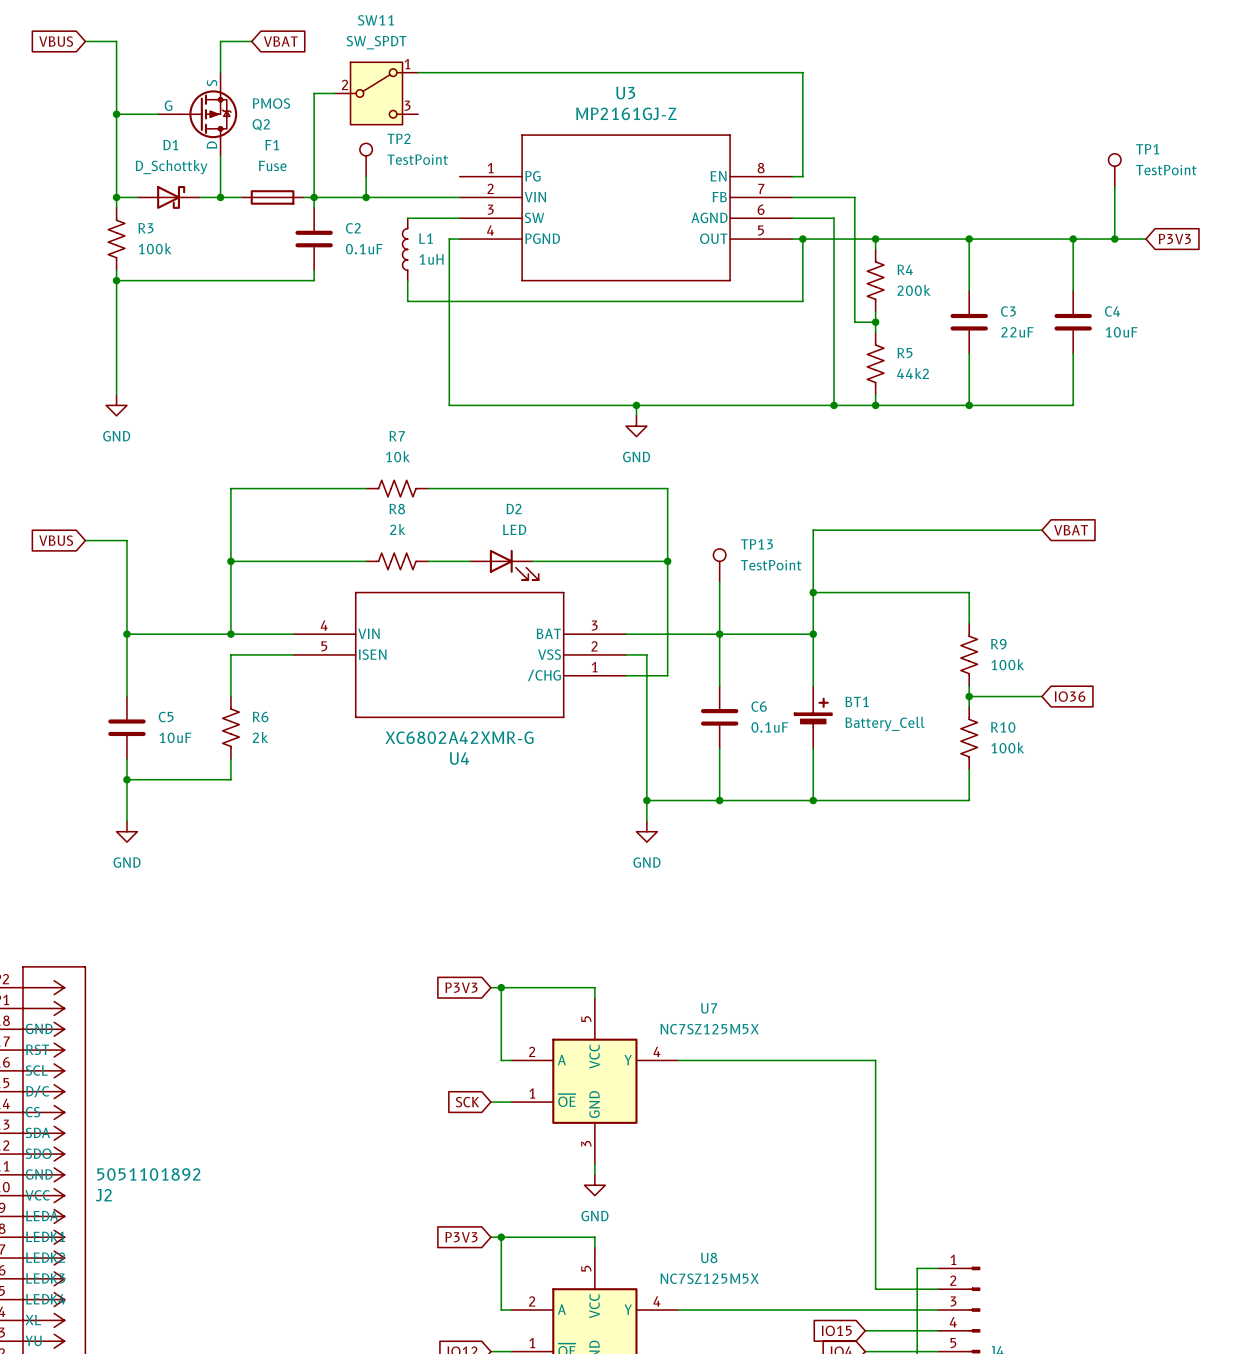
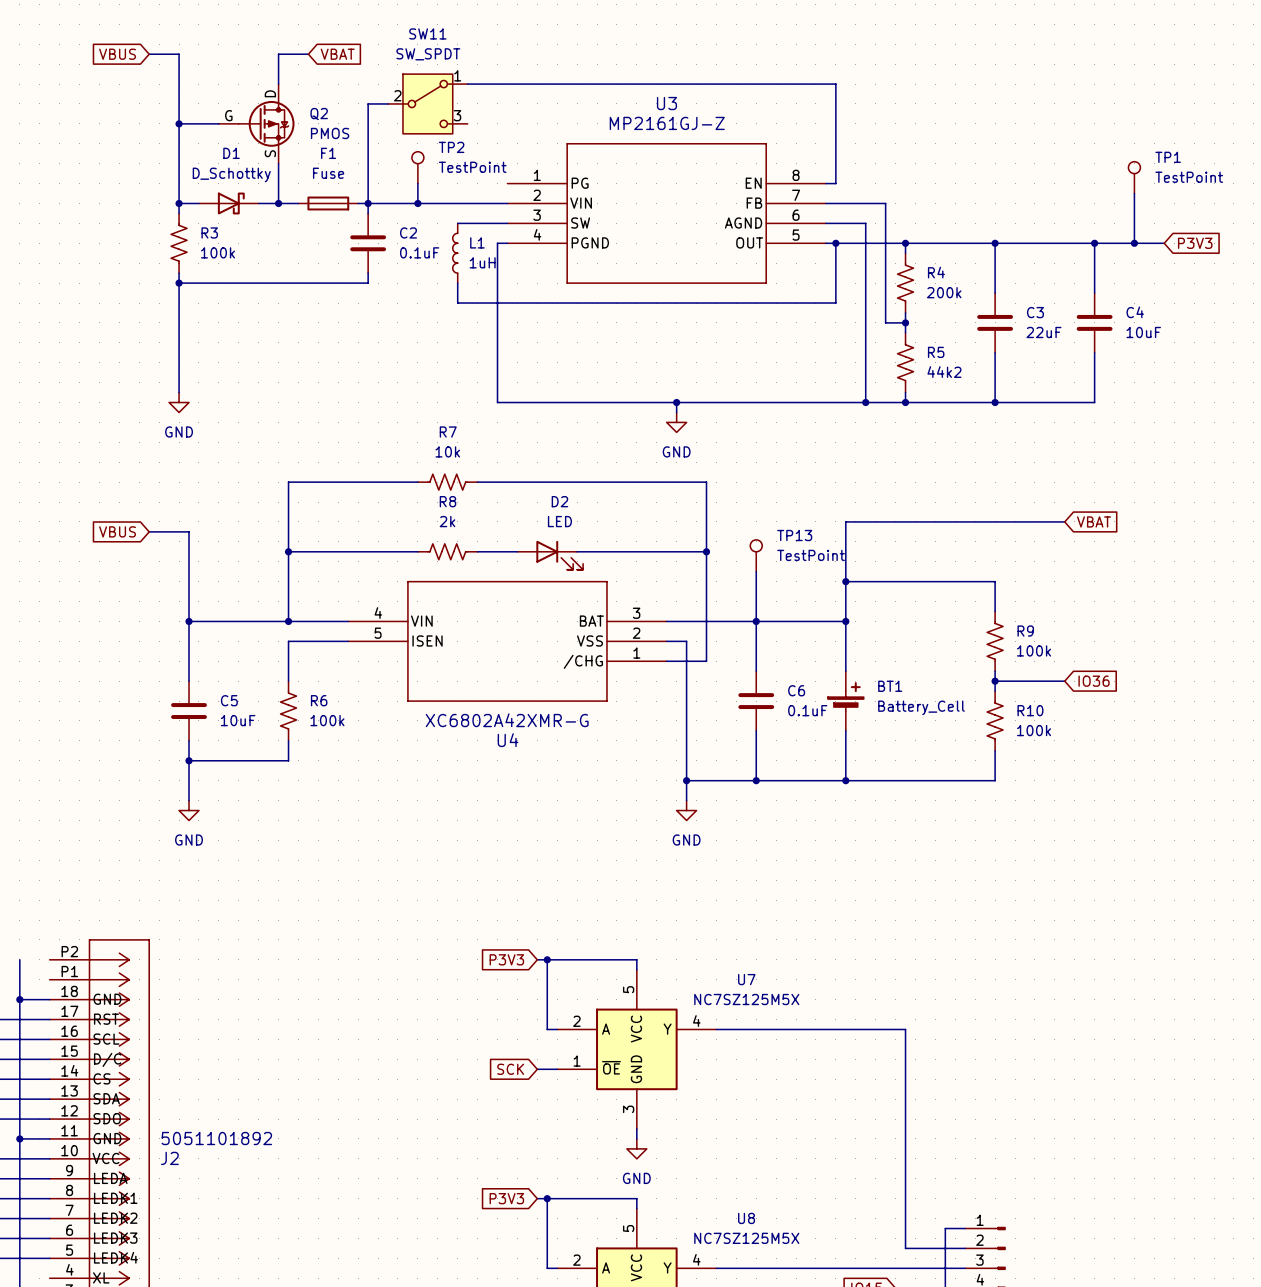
Q2 flip: as is (208, 114) -> up-down (266, 123)
R6 value: 2k (260, 737) -> 100k (327, 720)

